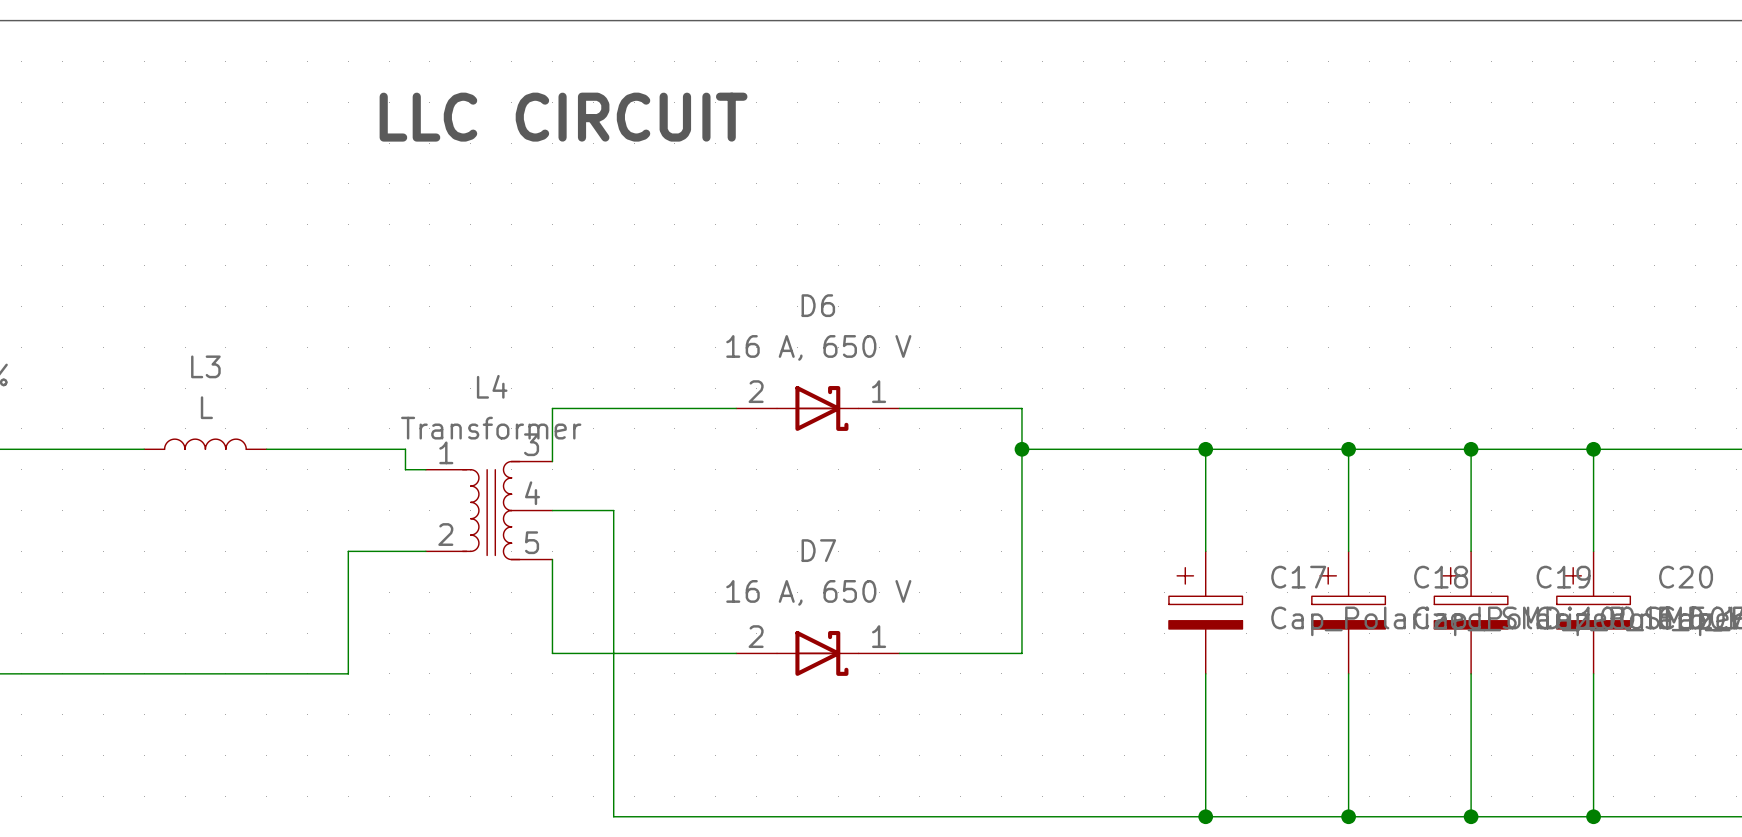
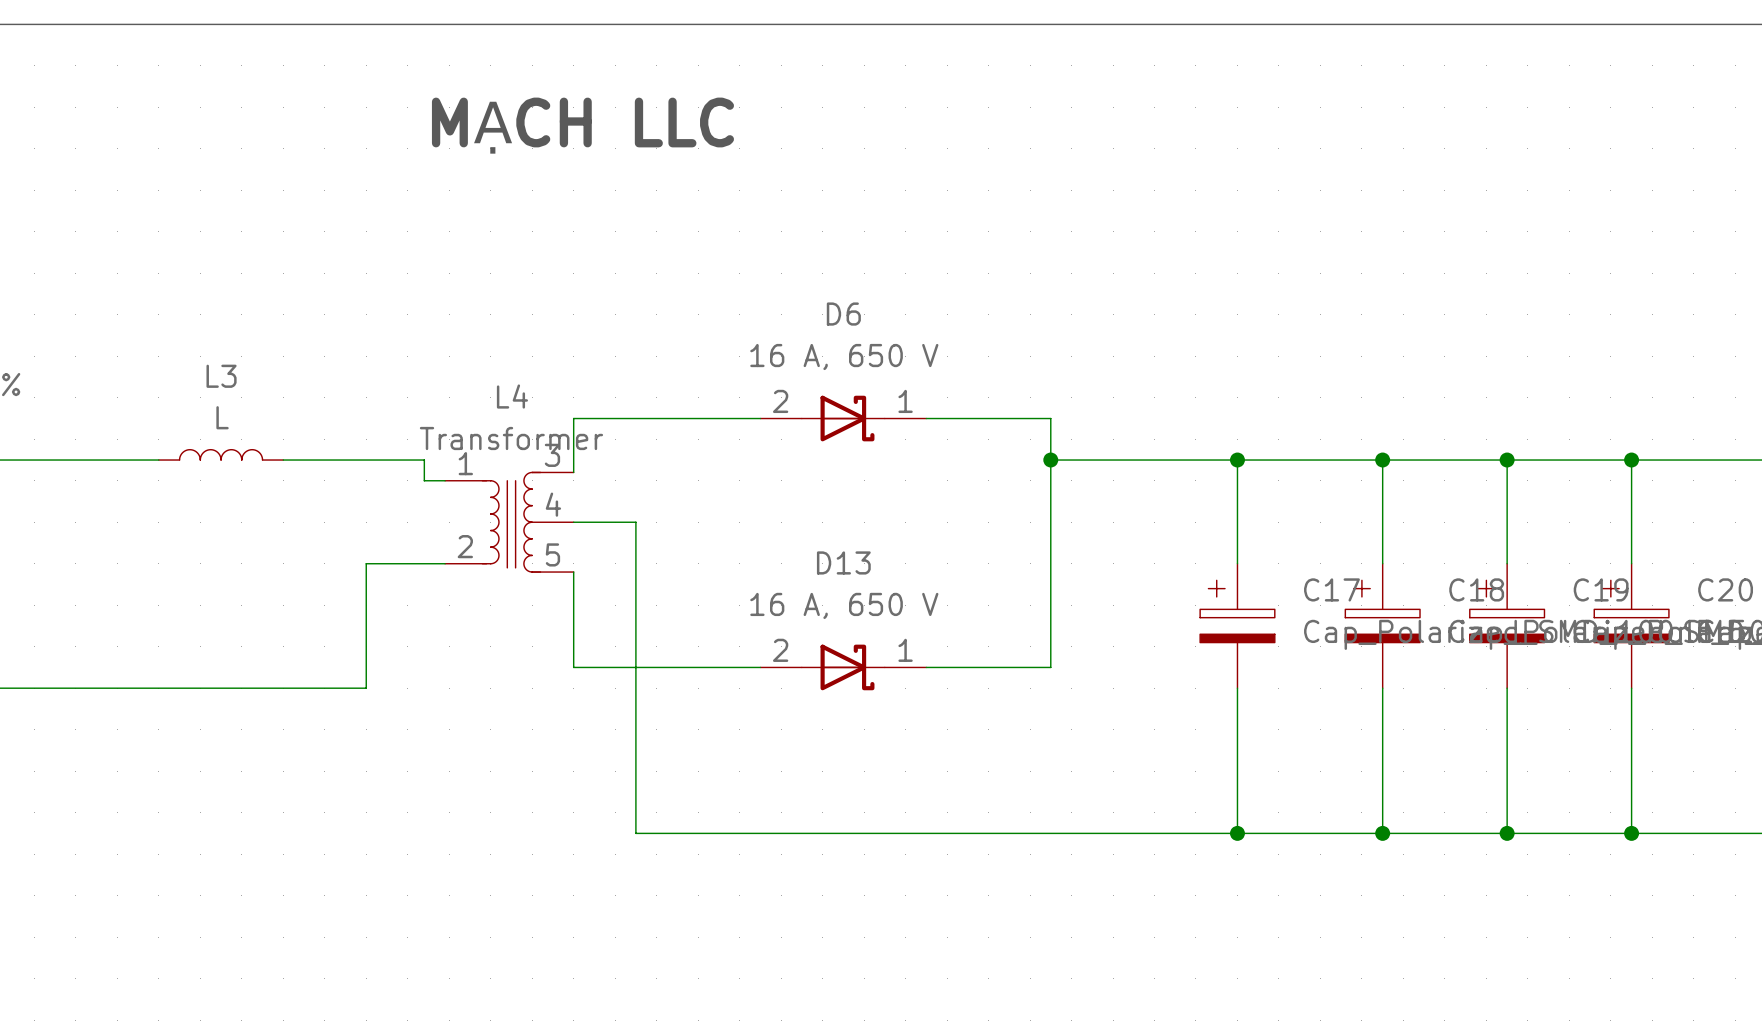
text: LLC CIRCUIT (563, 117) -> MẠCH LLC (582, 127)
D7 name: D7 (818, 550) -> D13 (843, 562)

